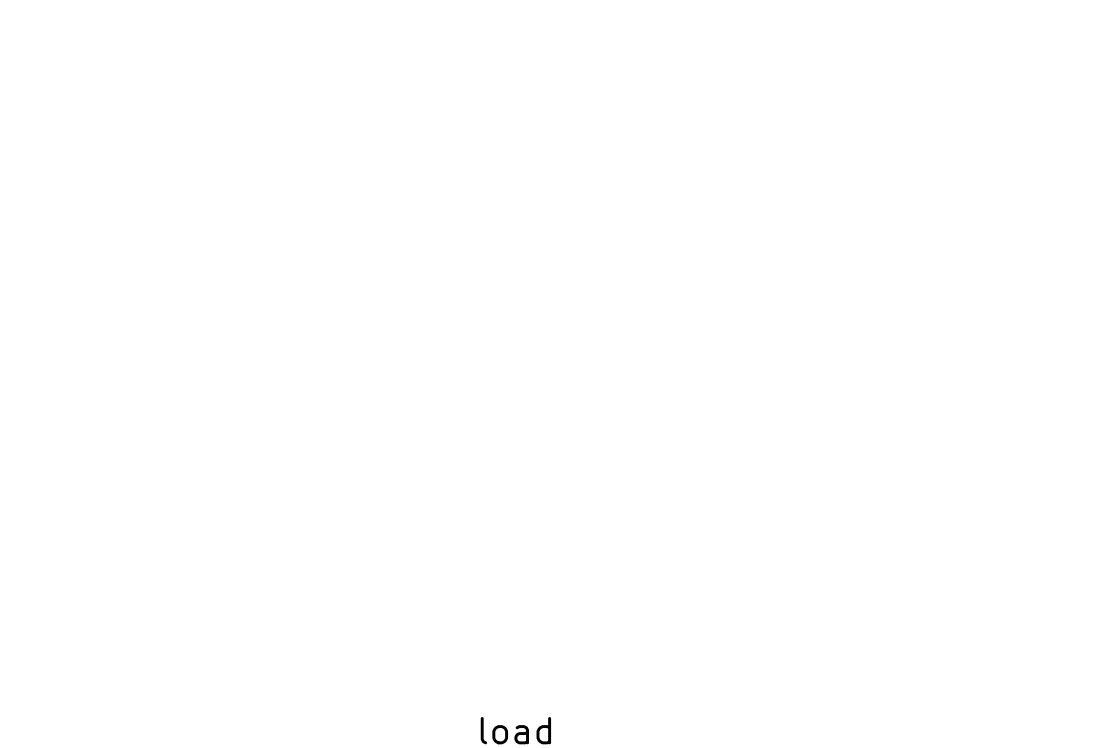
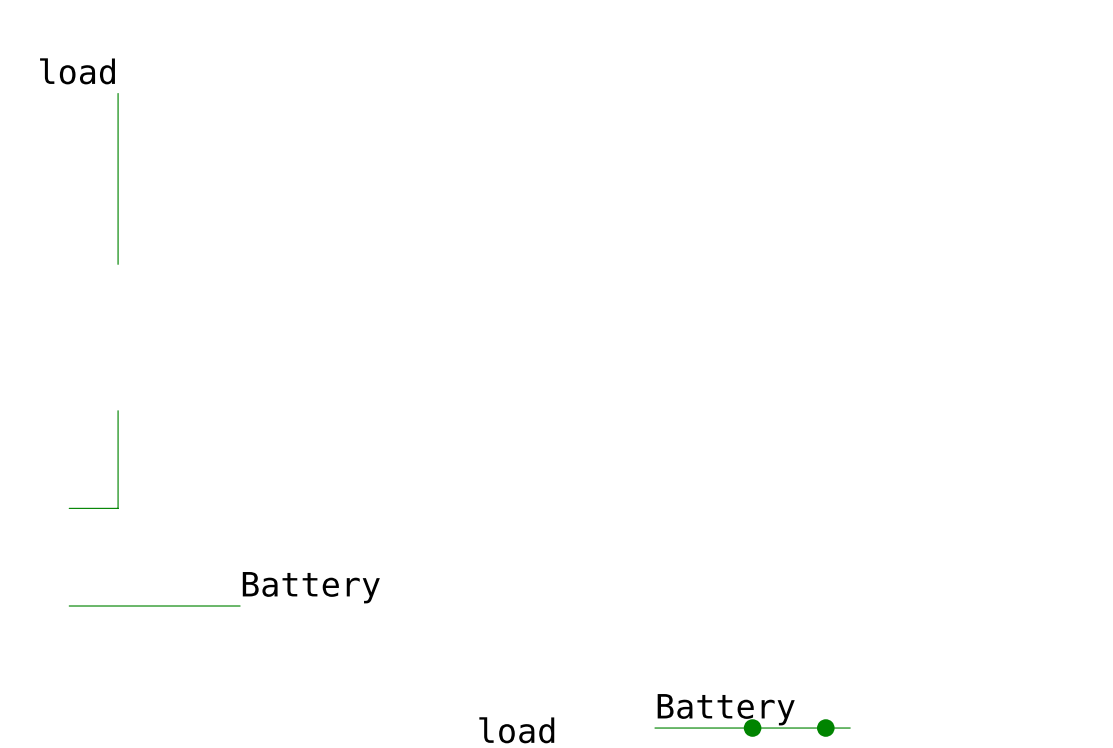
label: none -> load (77, 71)
wire: none -> (118, 93) (118, 264)
wire: none -> (118, 410) (118, 508) (69, 508)
label: none -> Battery (311, 587)
wire: none -> (69, 606) (240, 606)
label: none -> Battery (726, 709)
wire: none -> (654, 728) (850, 728)
junction: none -> (752, 728)
junction: none -> (825, 728)

